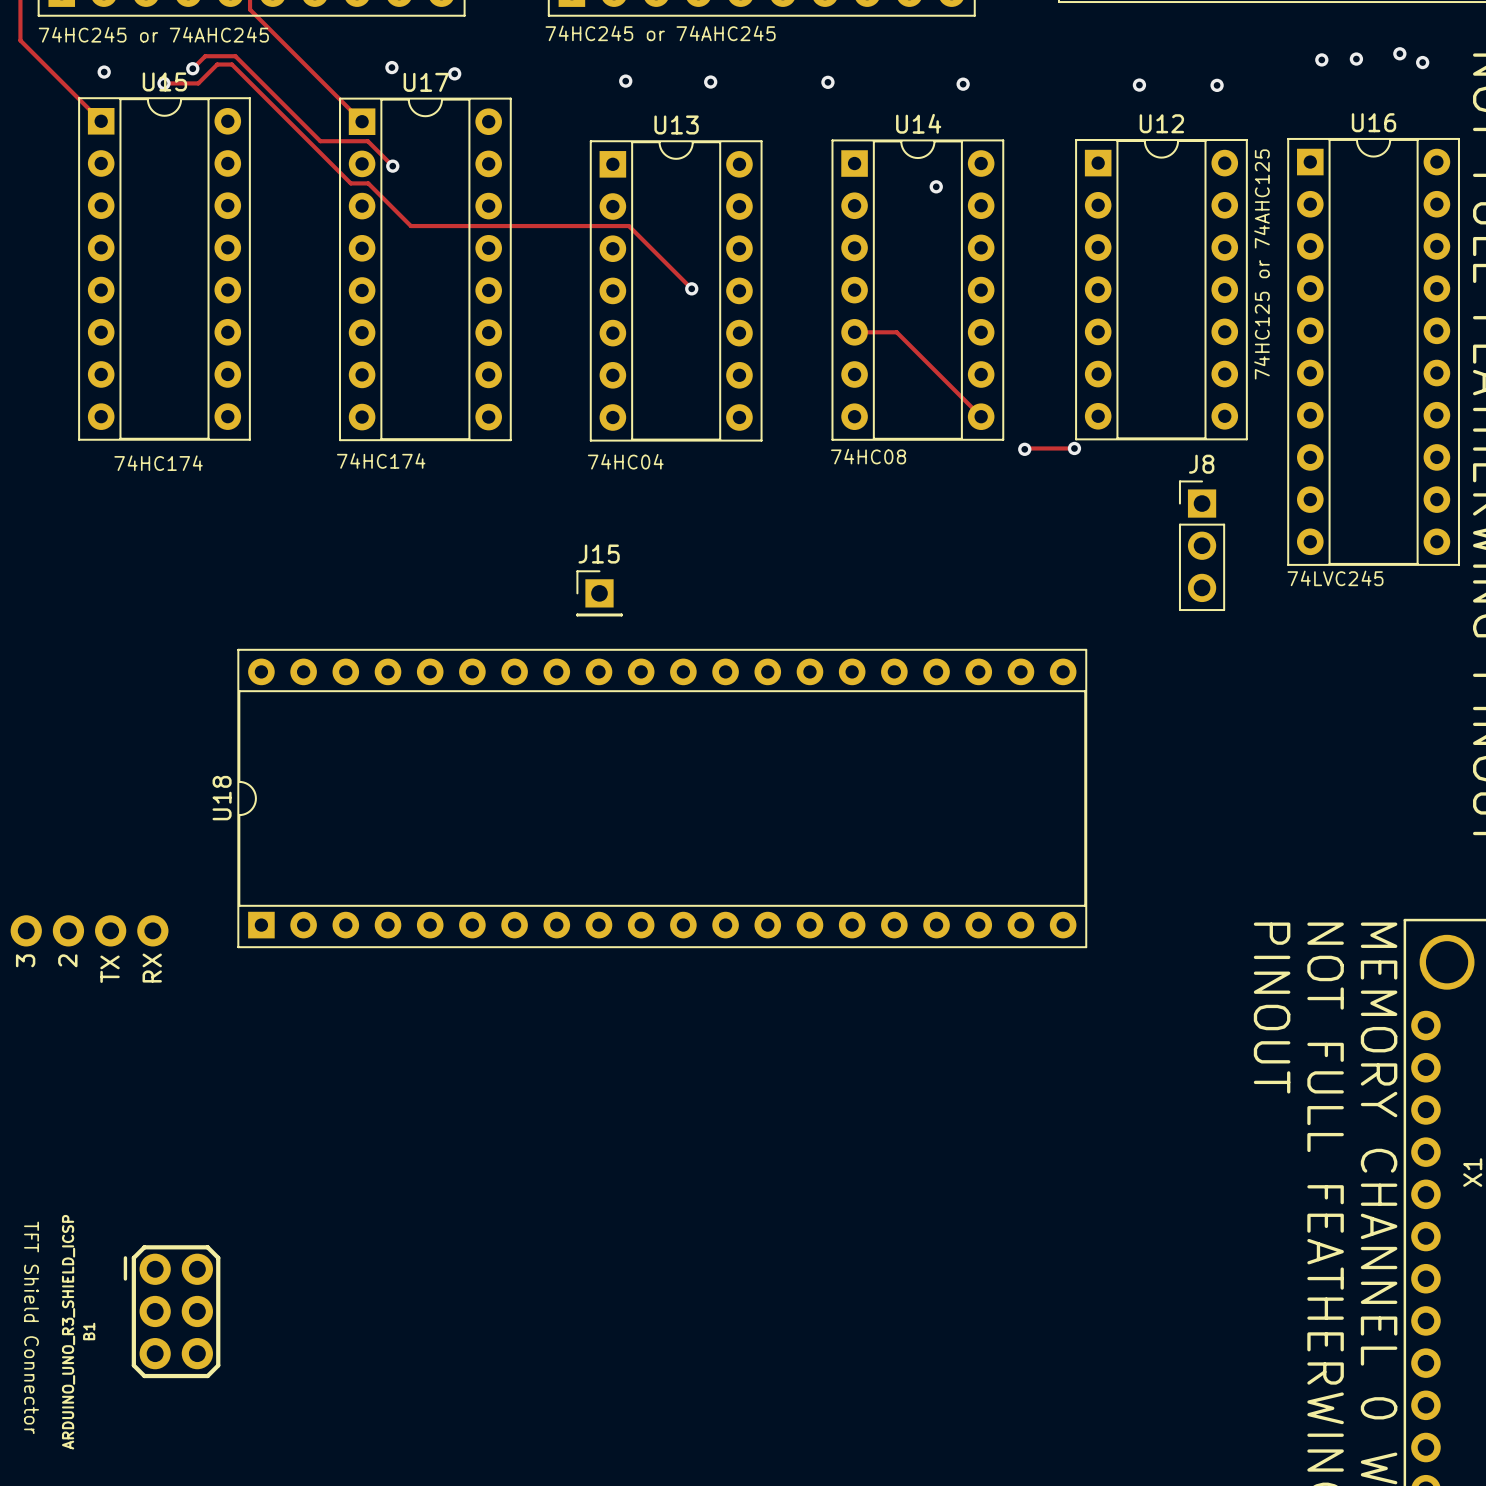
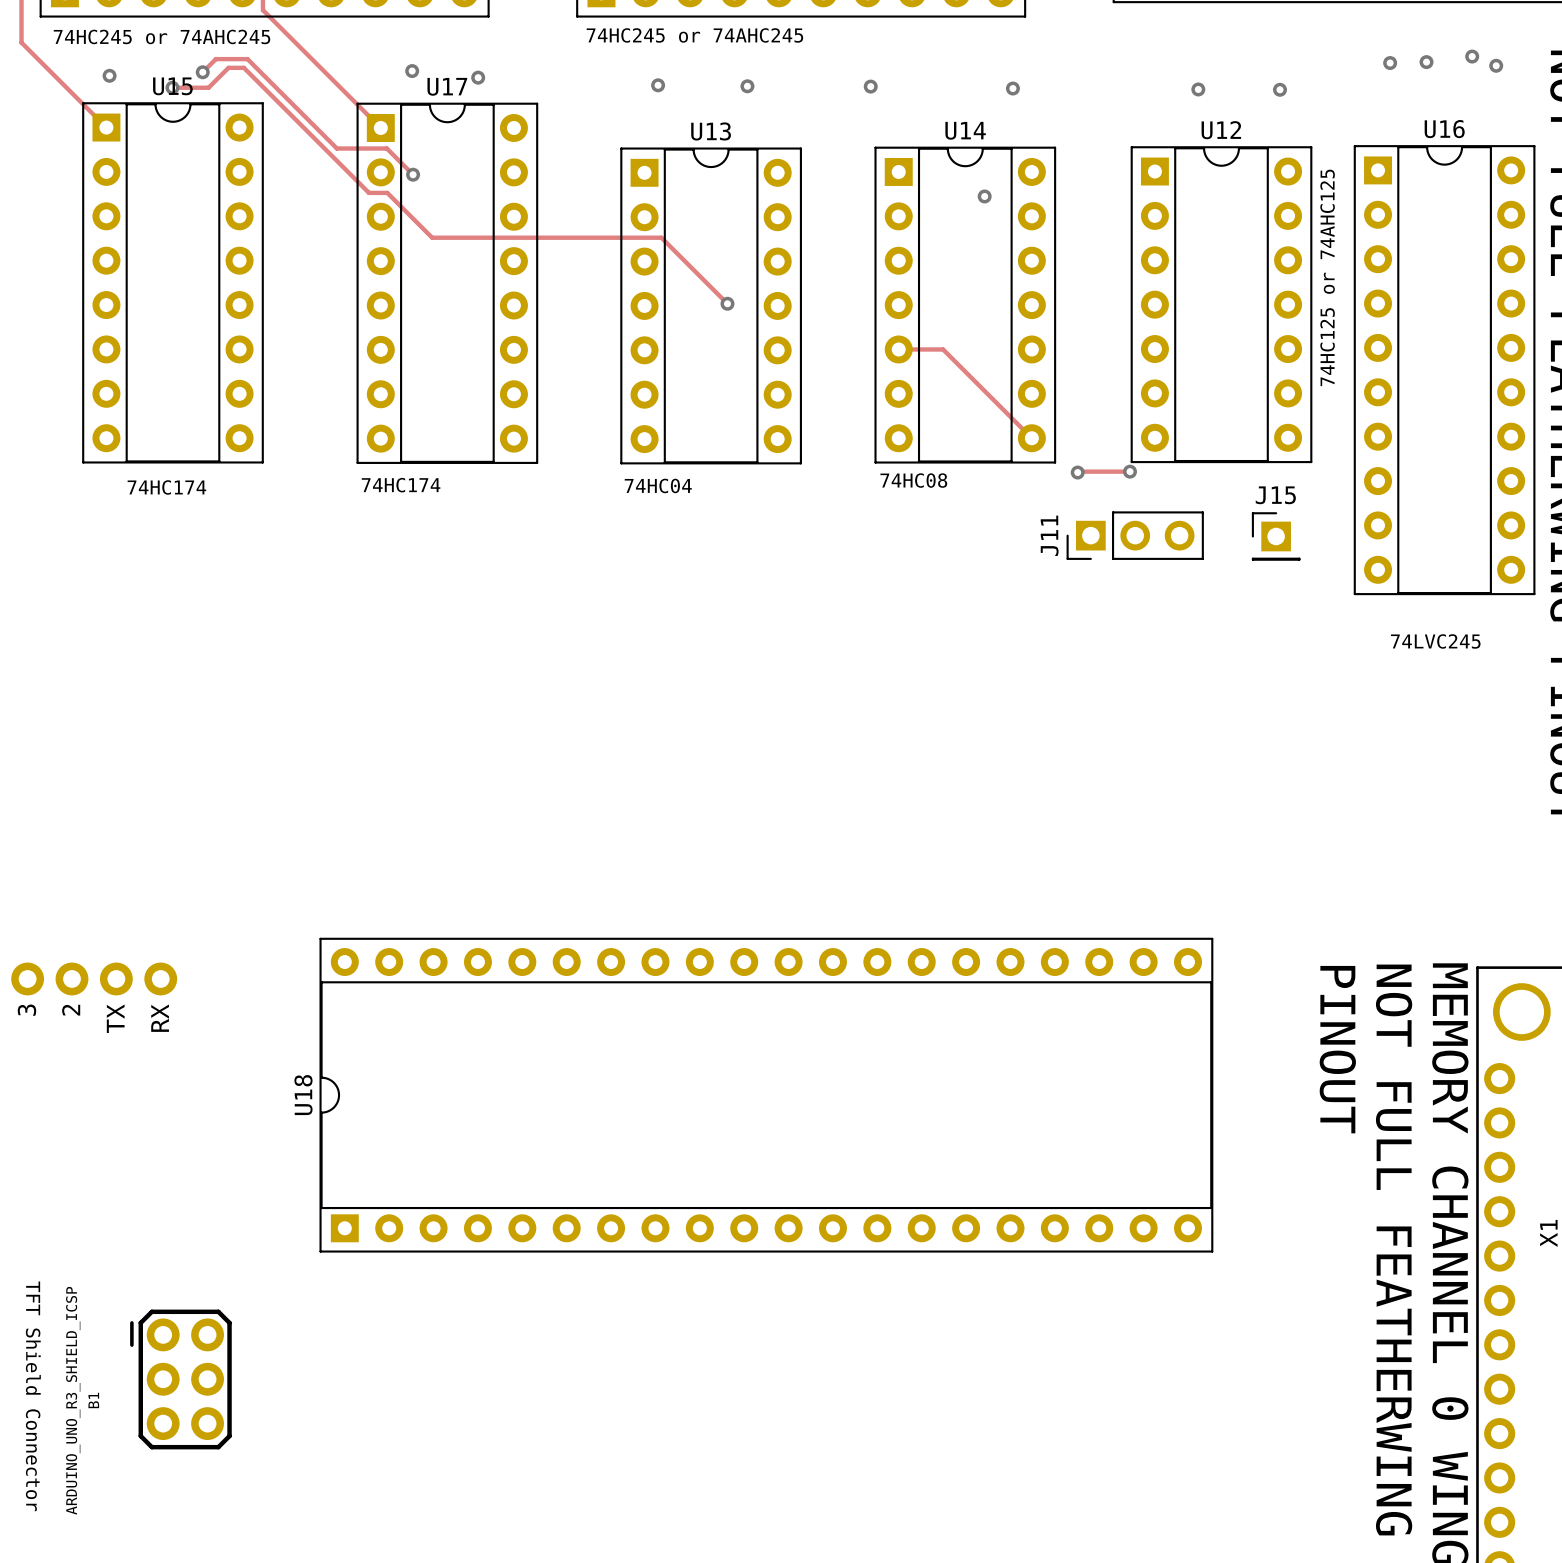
J11: none -> (1135, 535)
J8: (1202, 545) -> none
text position: 74LVC245 (1335, 578) -> 74LVC245 (1435, 641)
J15 position: (599, 593) -> (1276, 536)
U18 position: (662, 798) -> (766, 1095)

